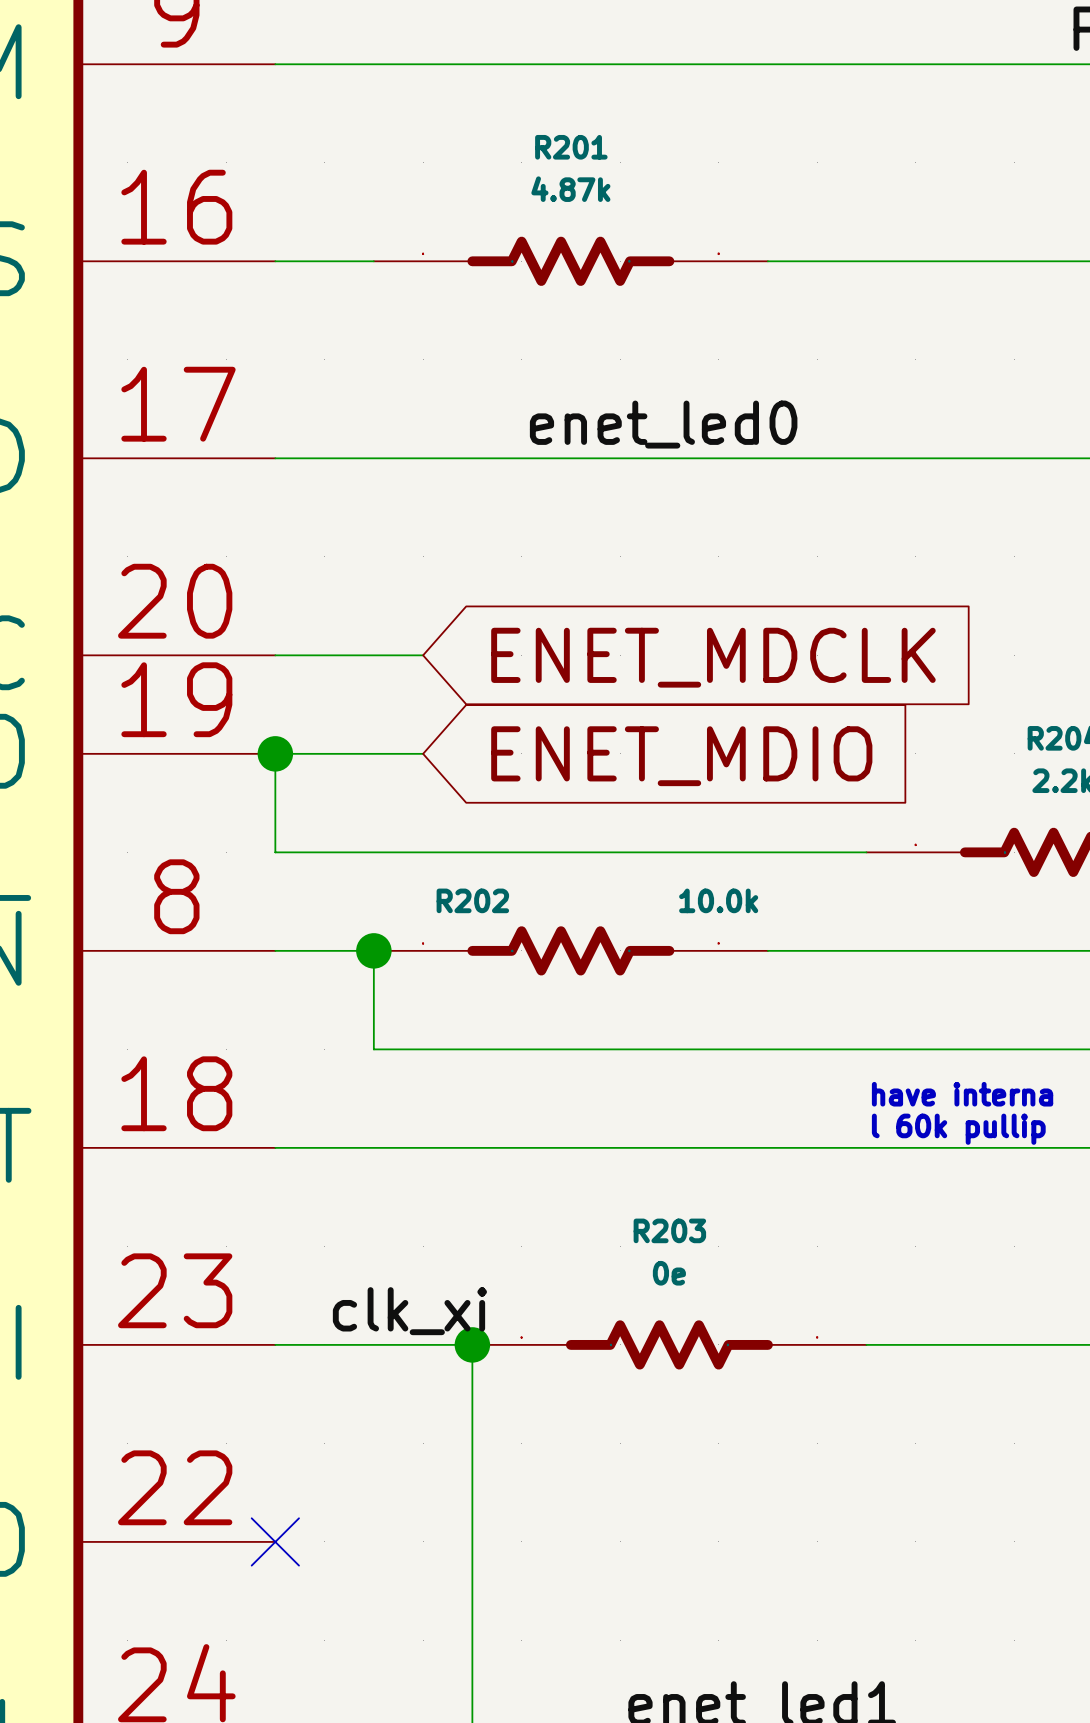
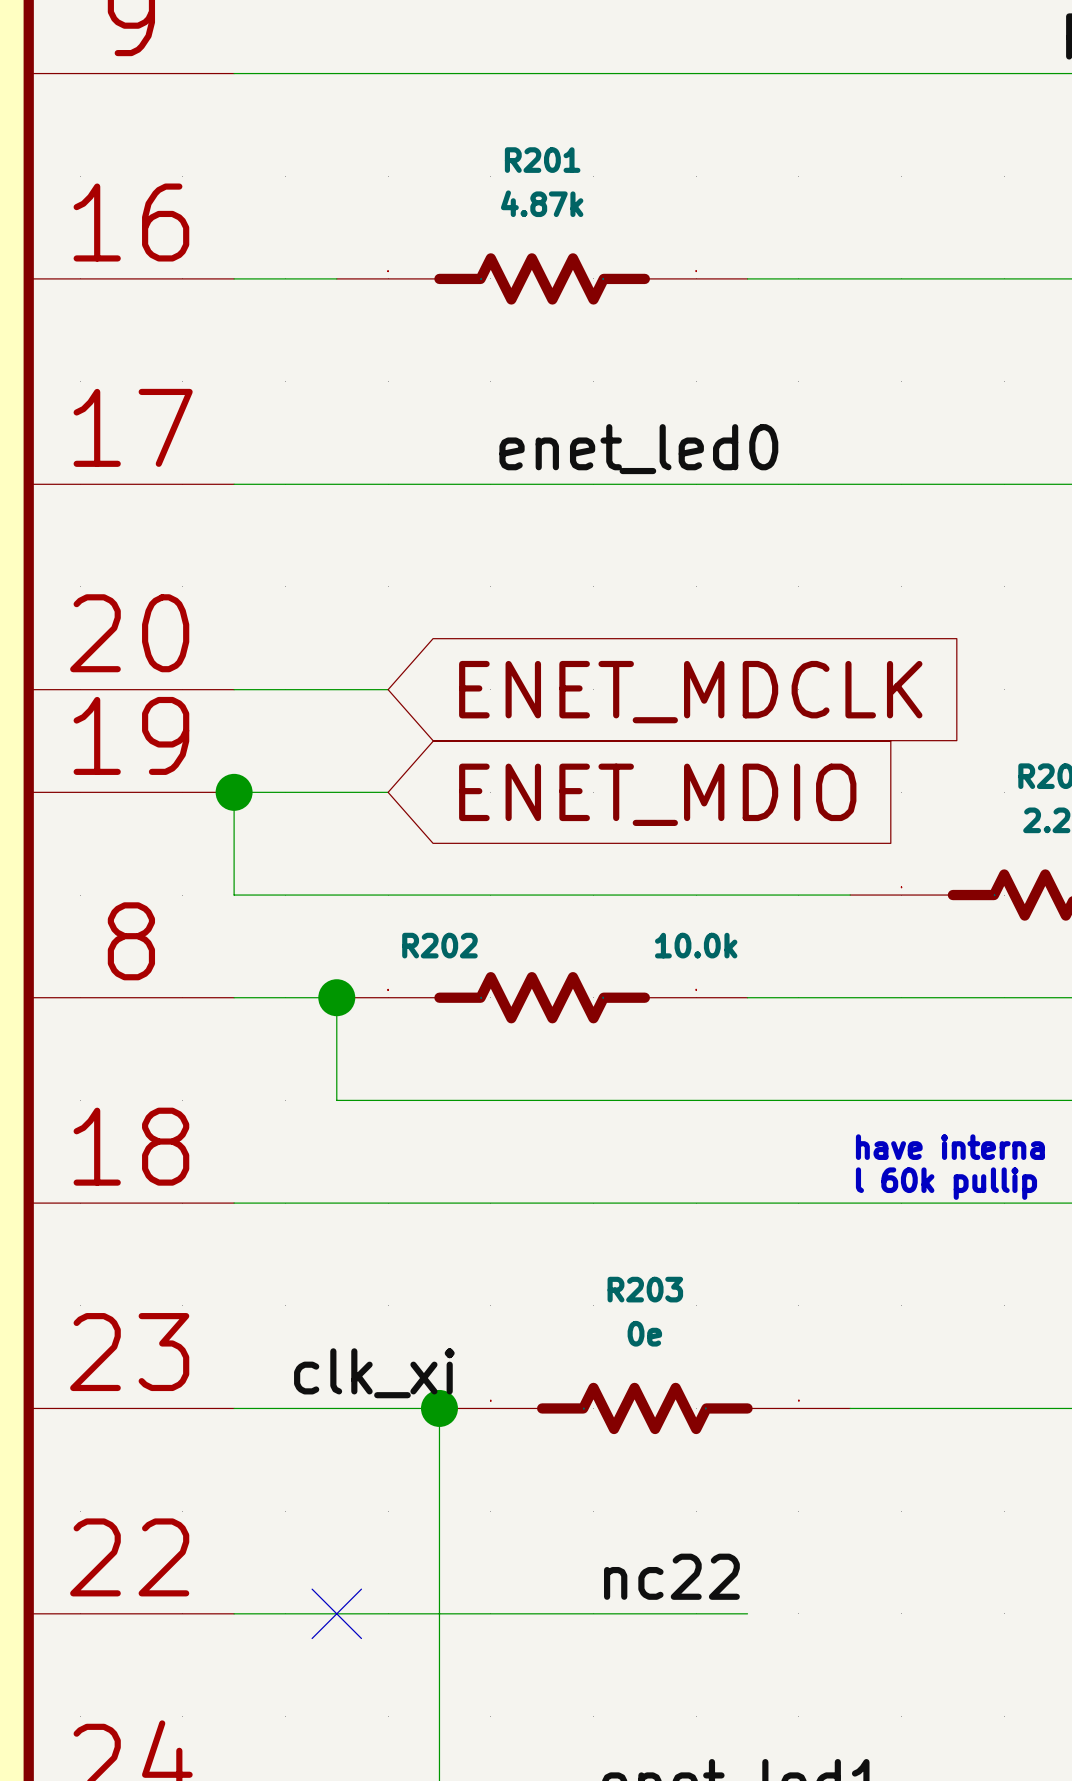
label: none -> nc22 (671, 1576)
wire: none -> (234, 1613) (747, 1613)
no-connect mark position: (275, 1541) -> (336, 1613)

